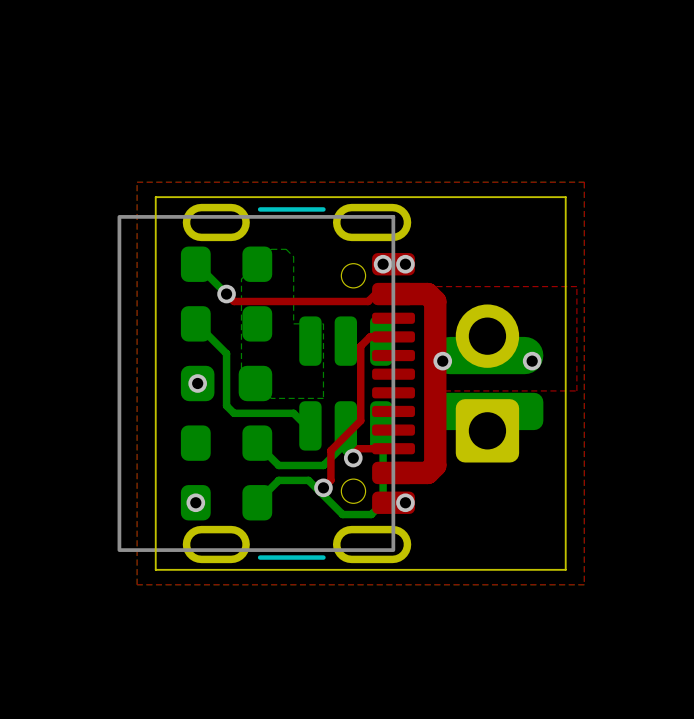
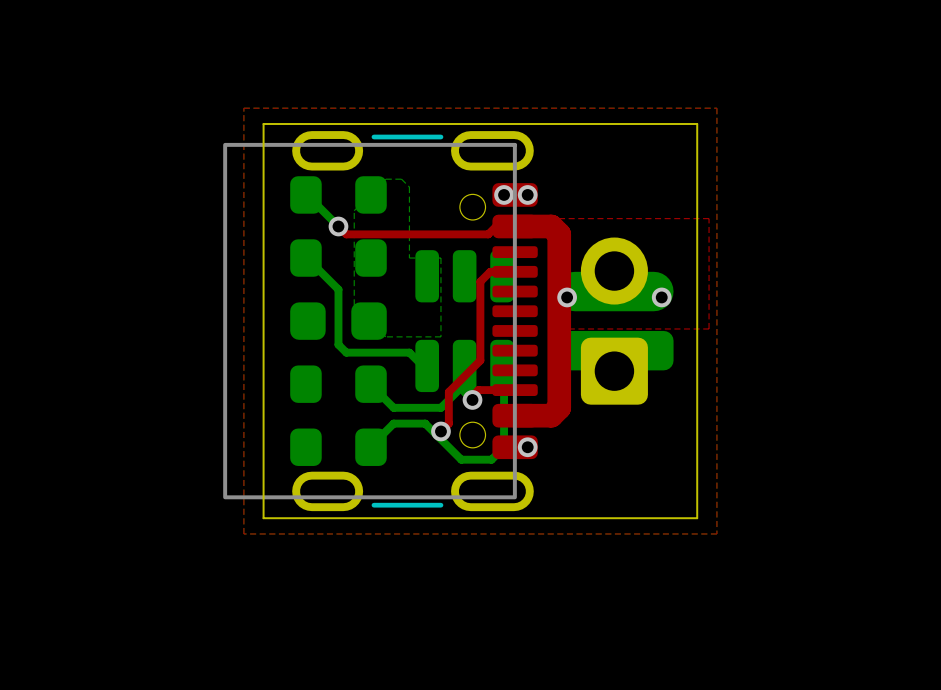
via: (197, 383) -> none
via: (195, 502) -> none

